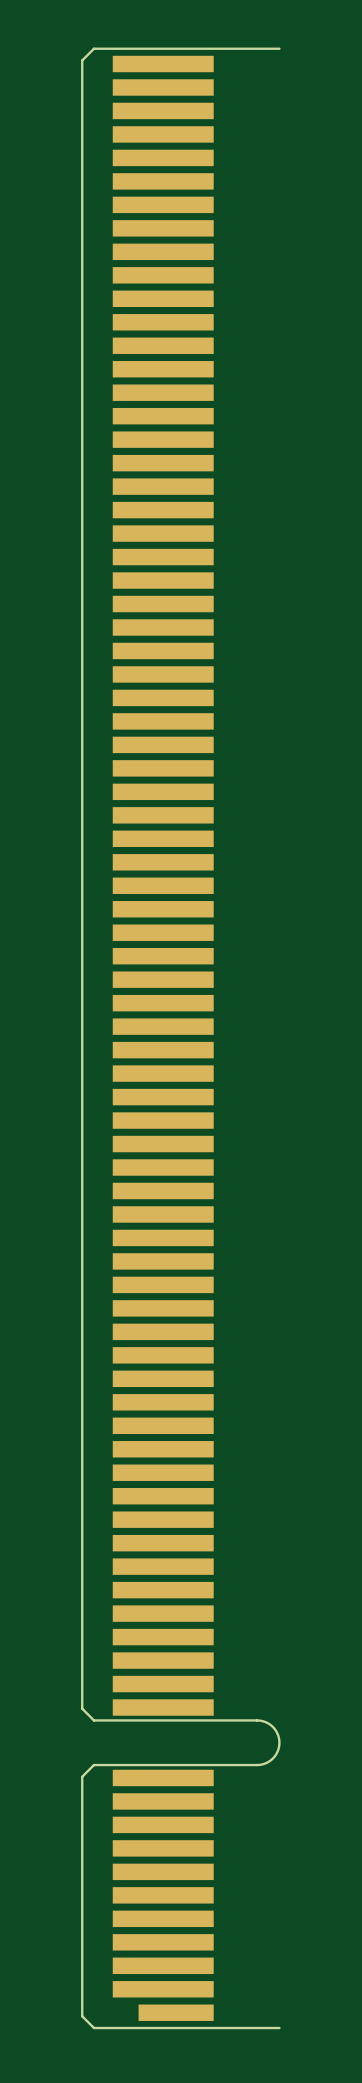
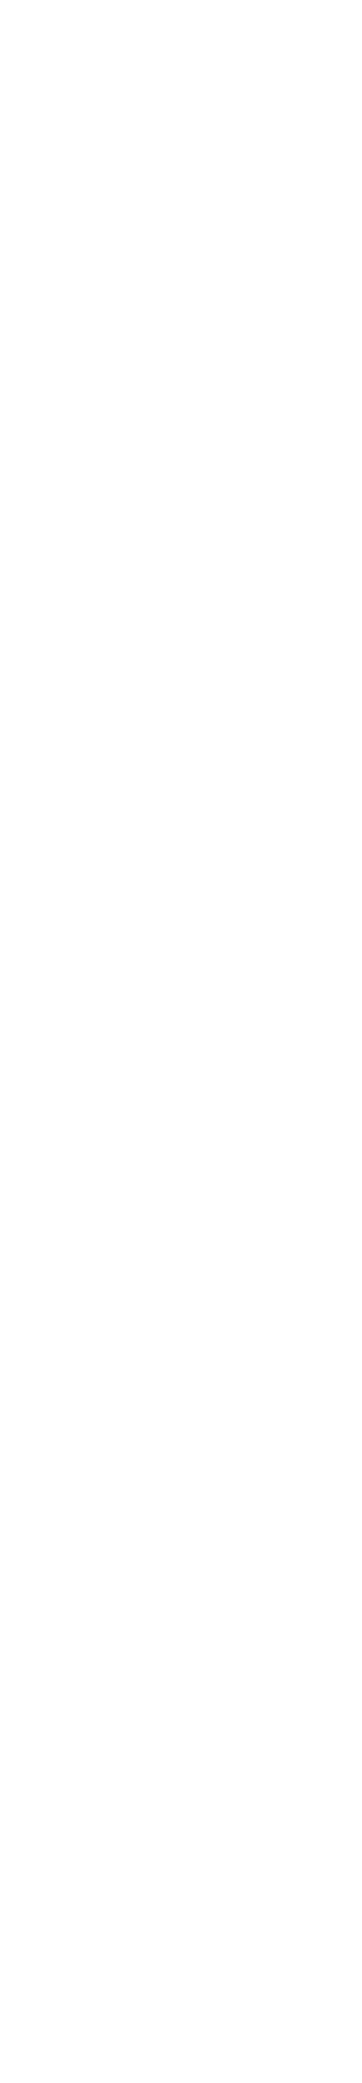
part: (180, 1038) -> none

